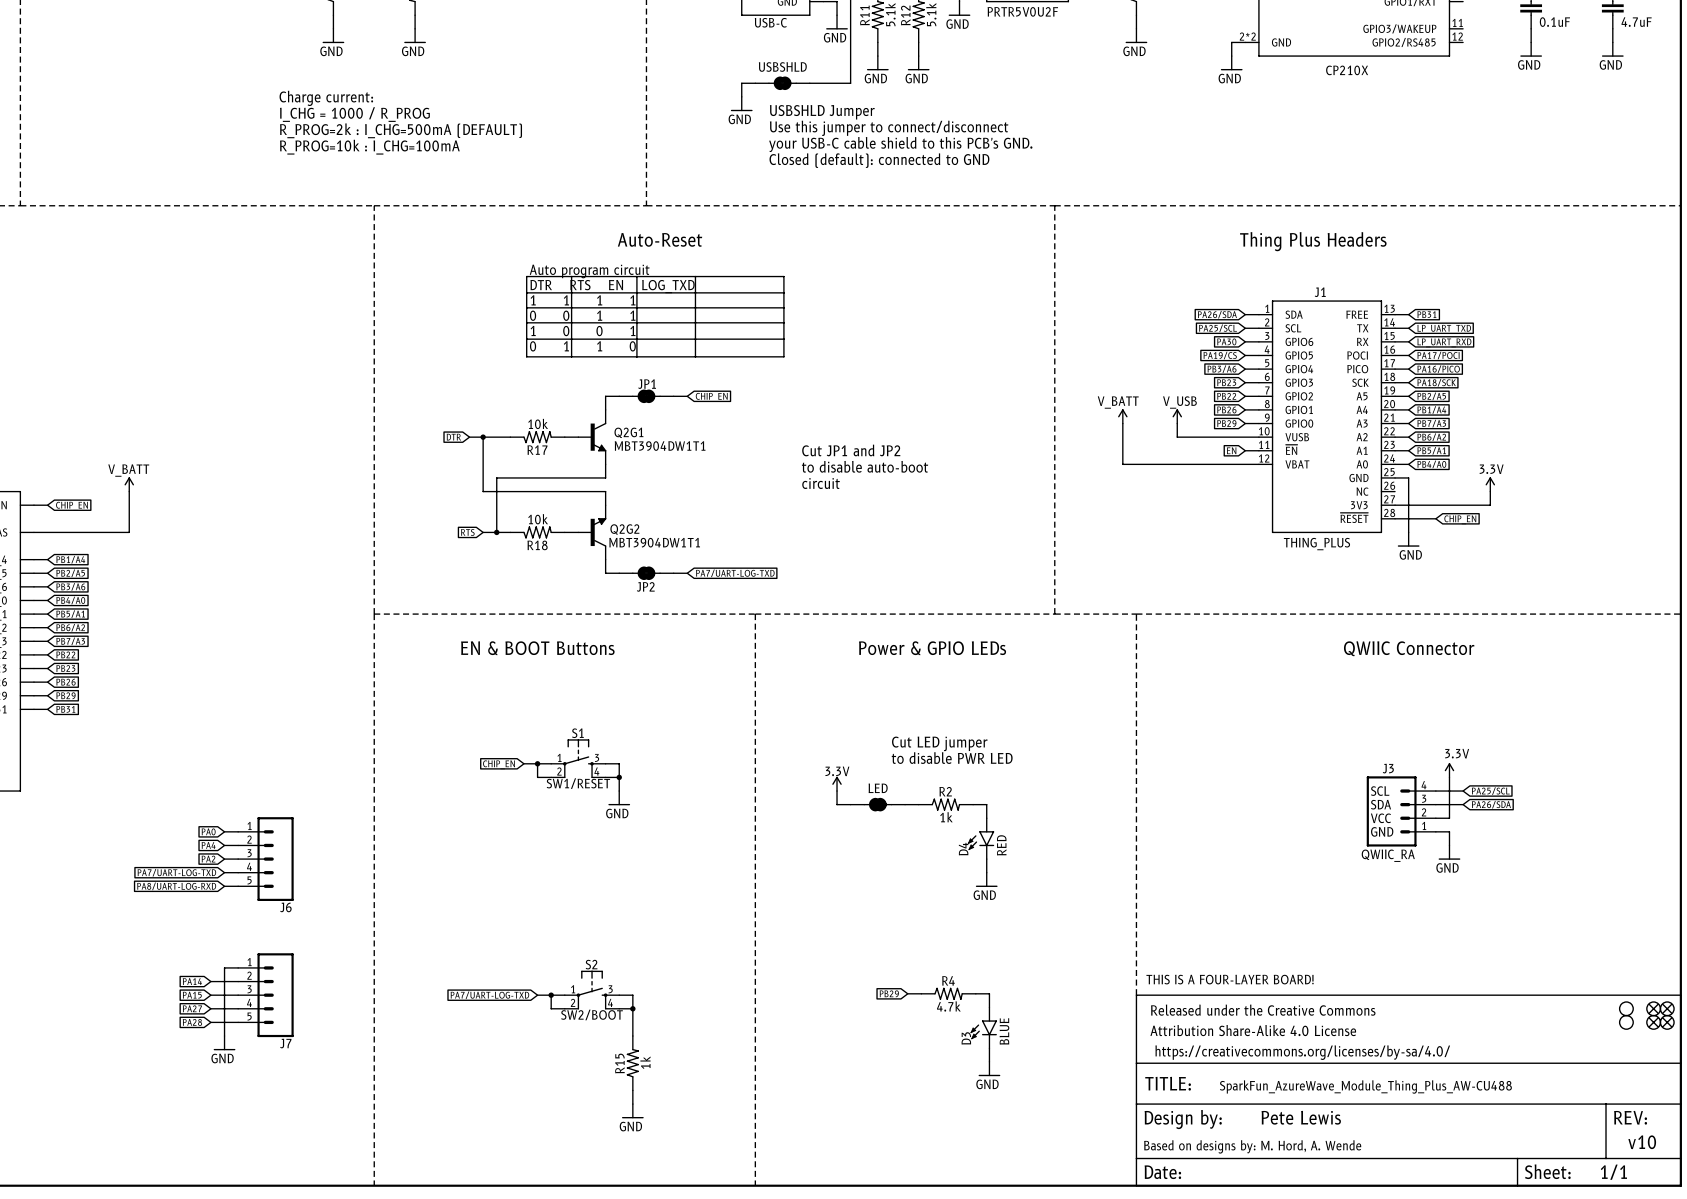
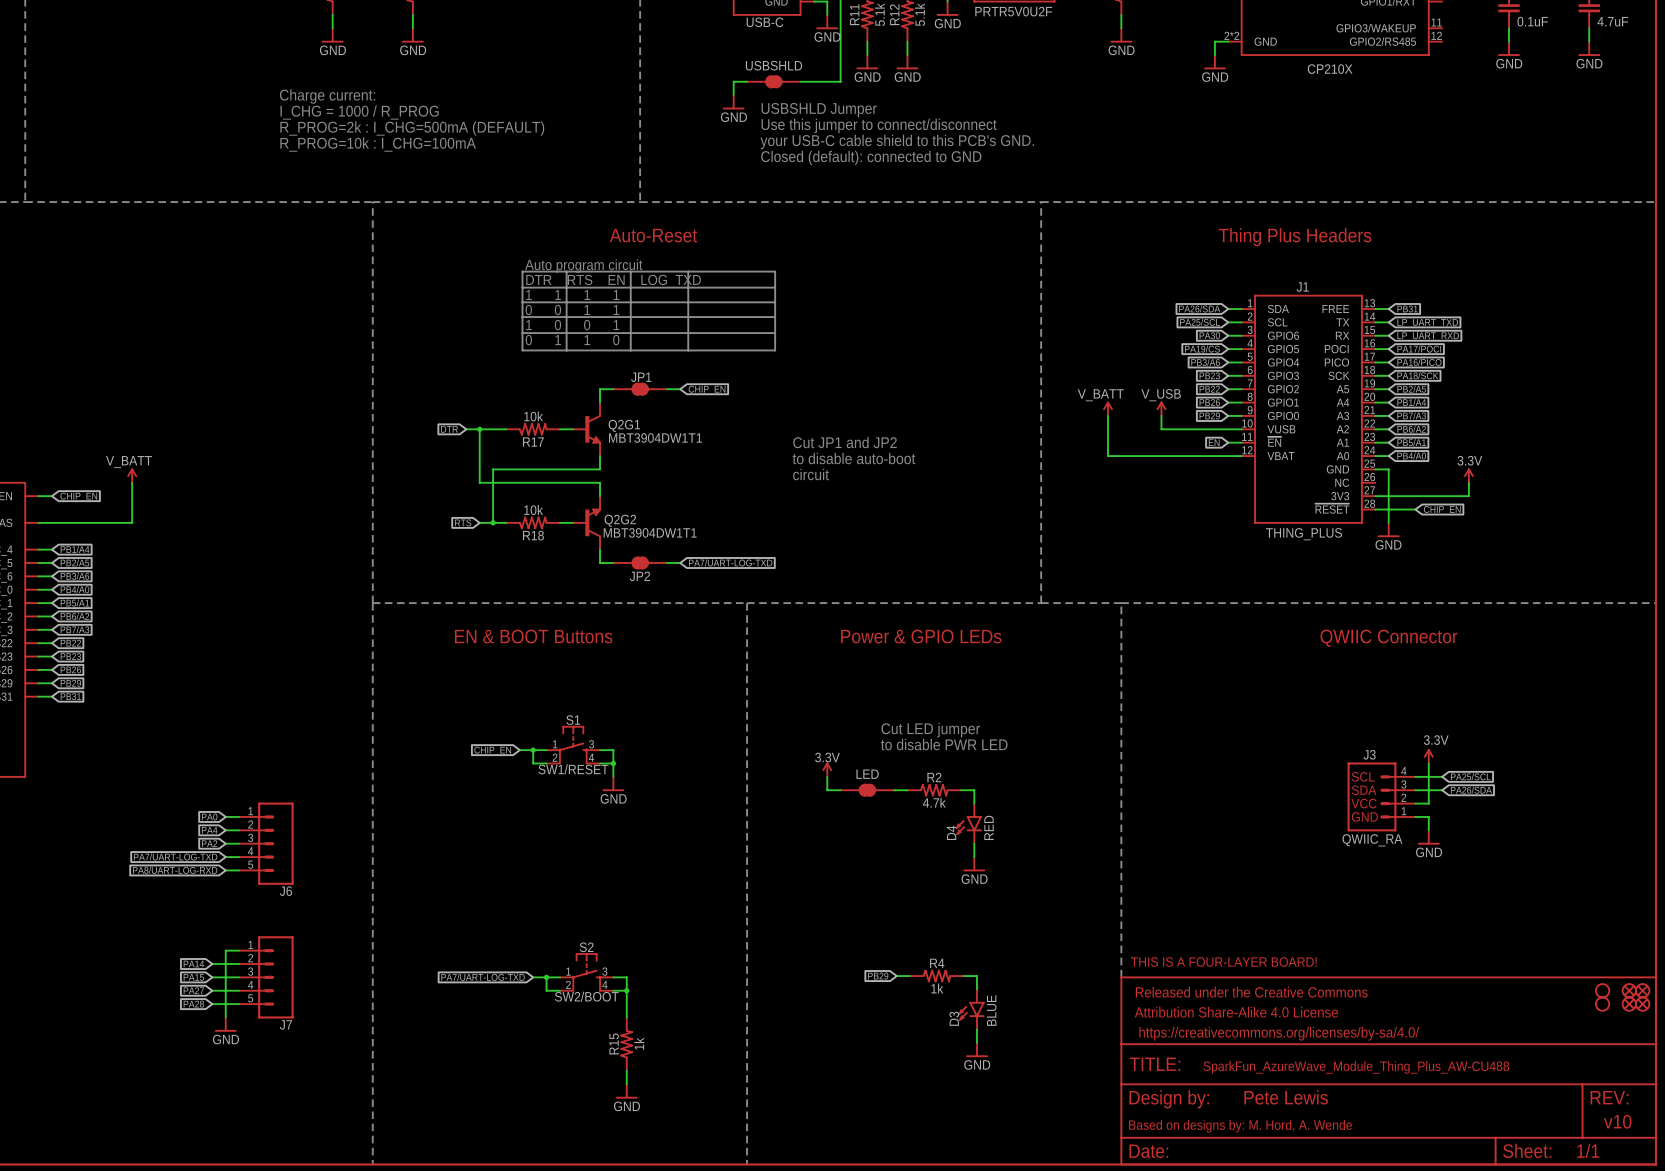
R2 value: 1k (946, 817) -> 4.7k (934, 802)
R4 value: 4.7k (948, 1006) -> 1k (937, 988)

